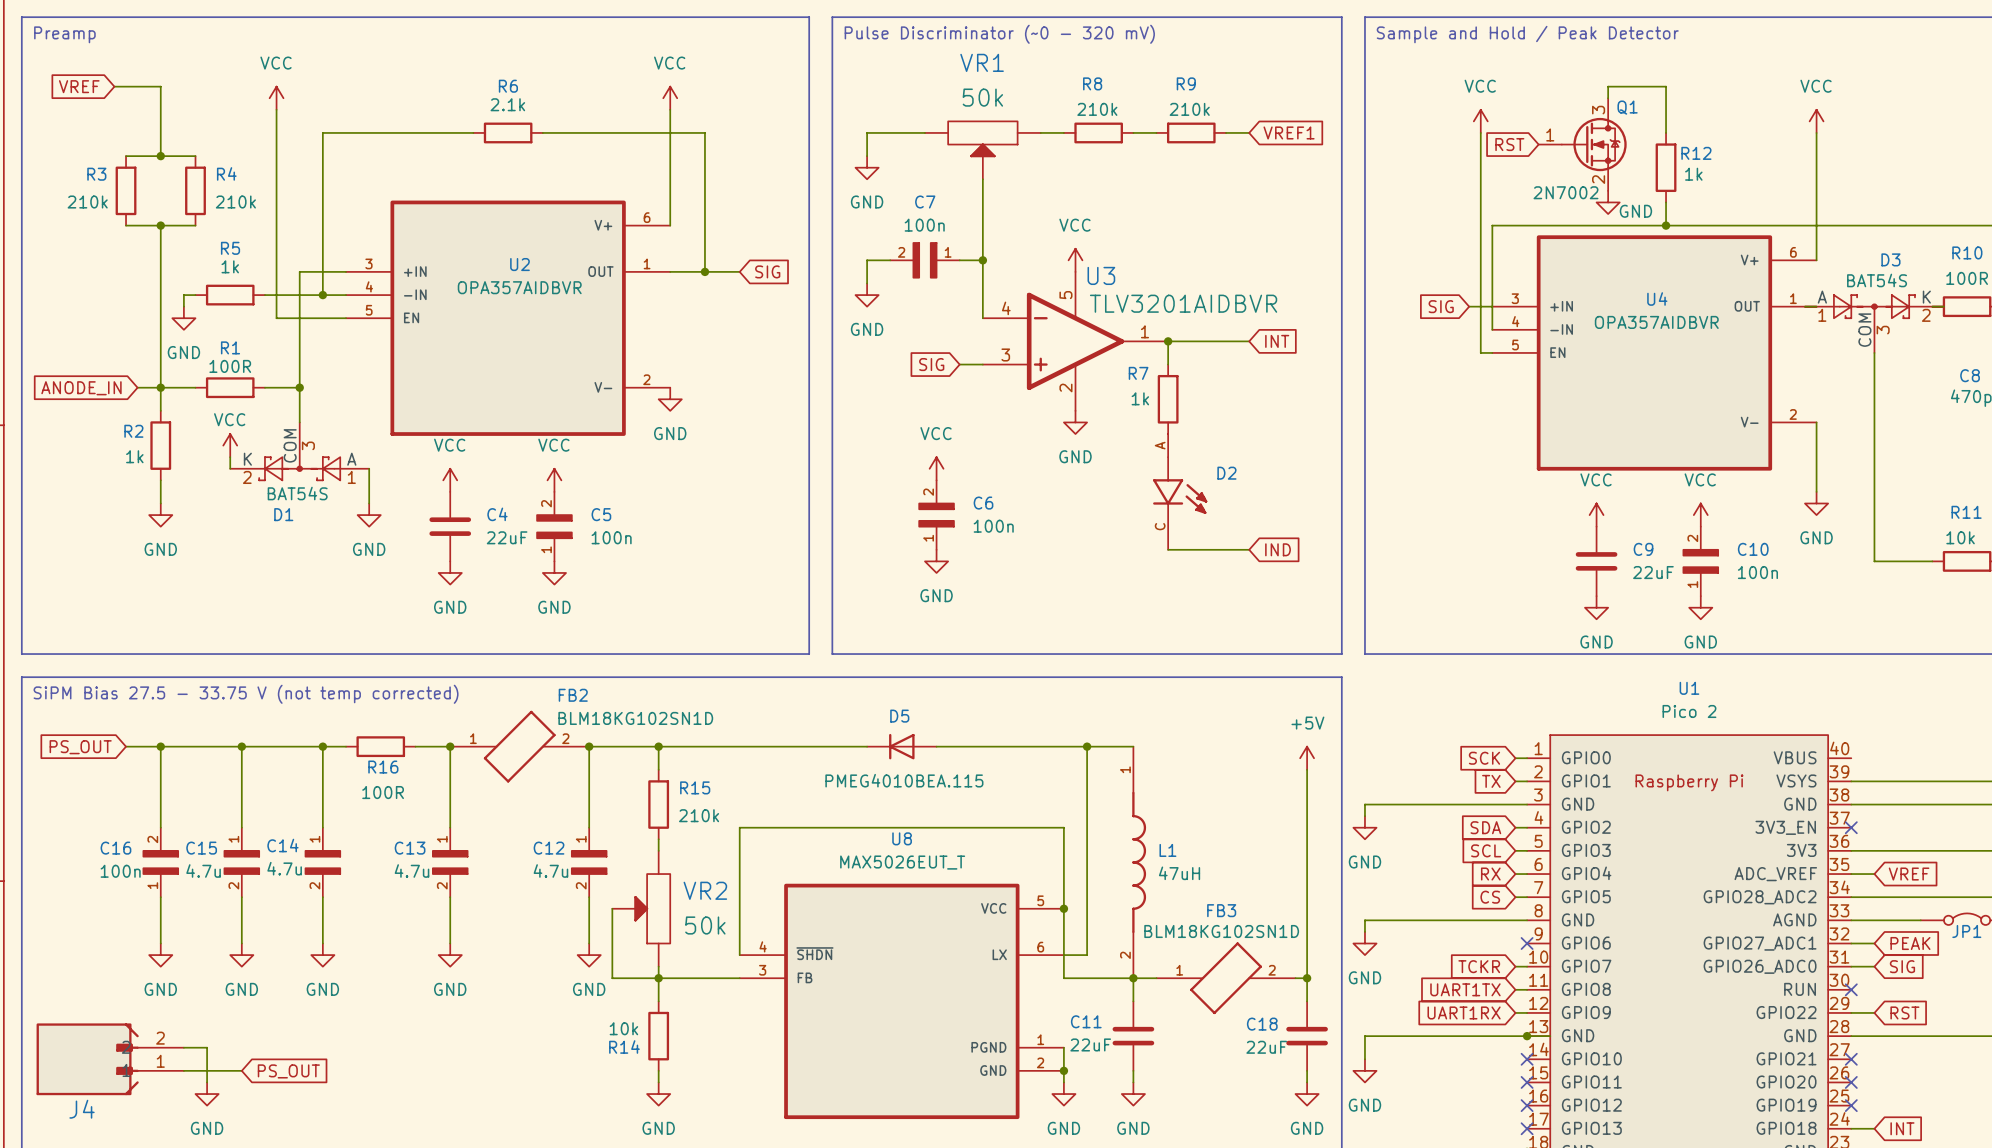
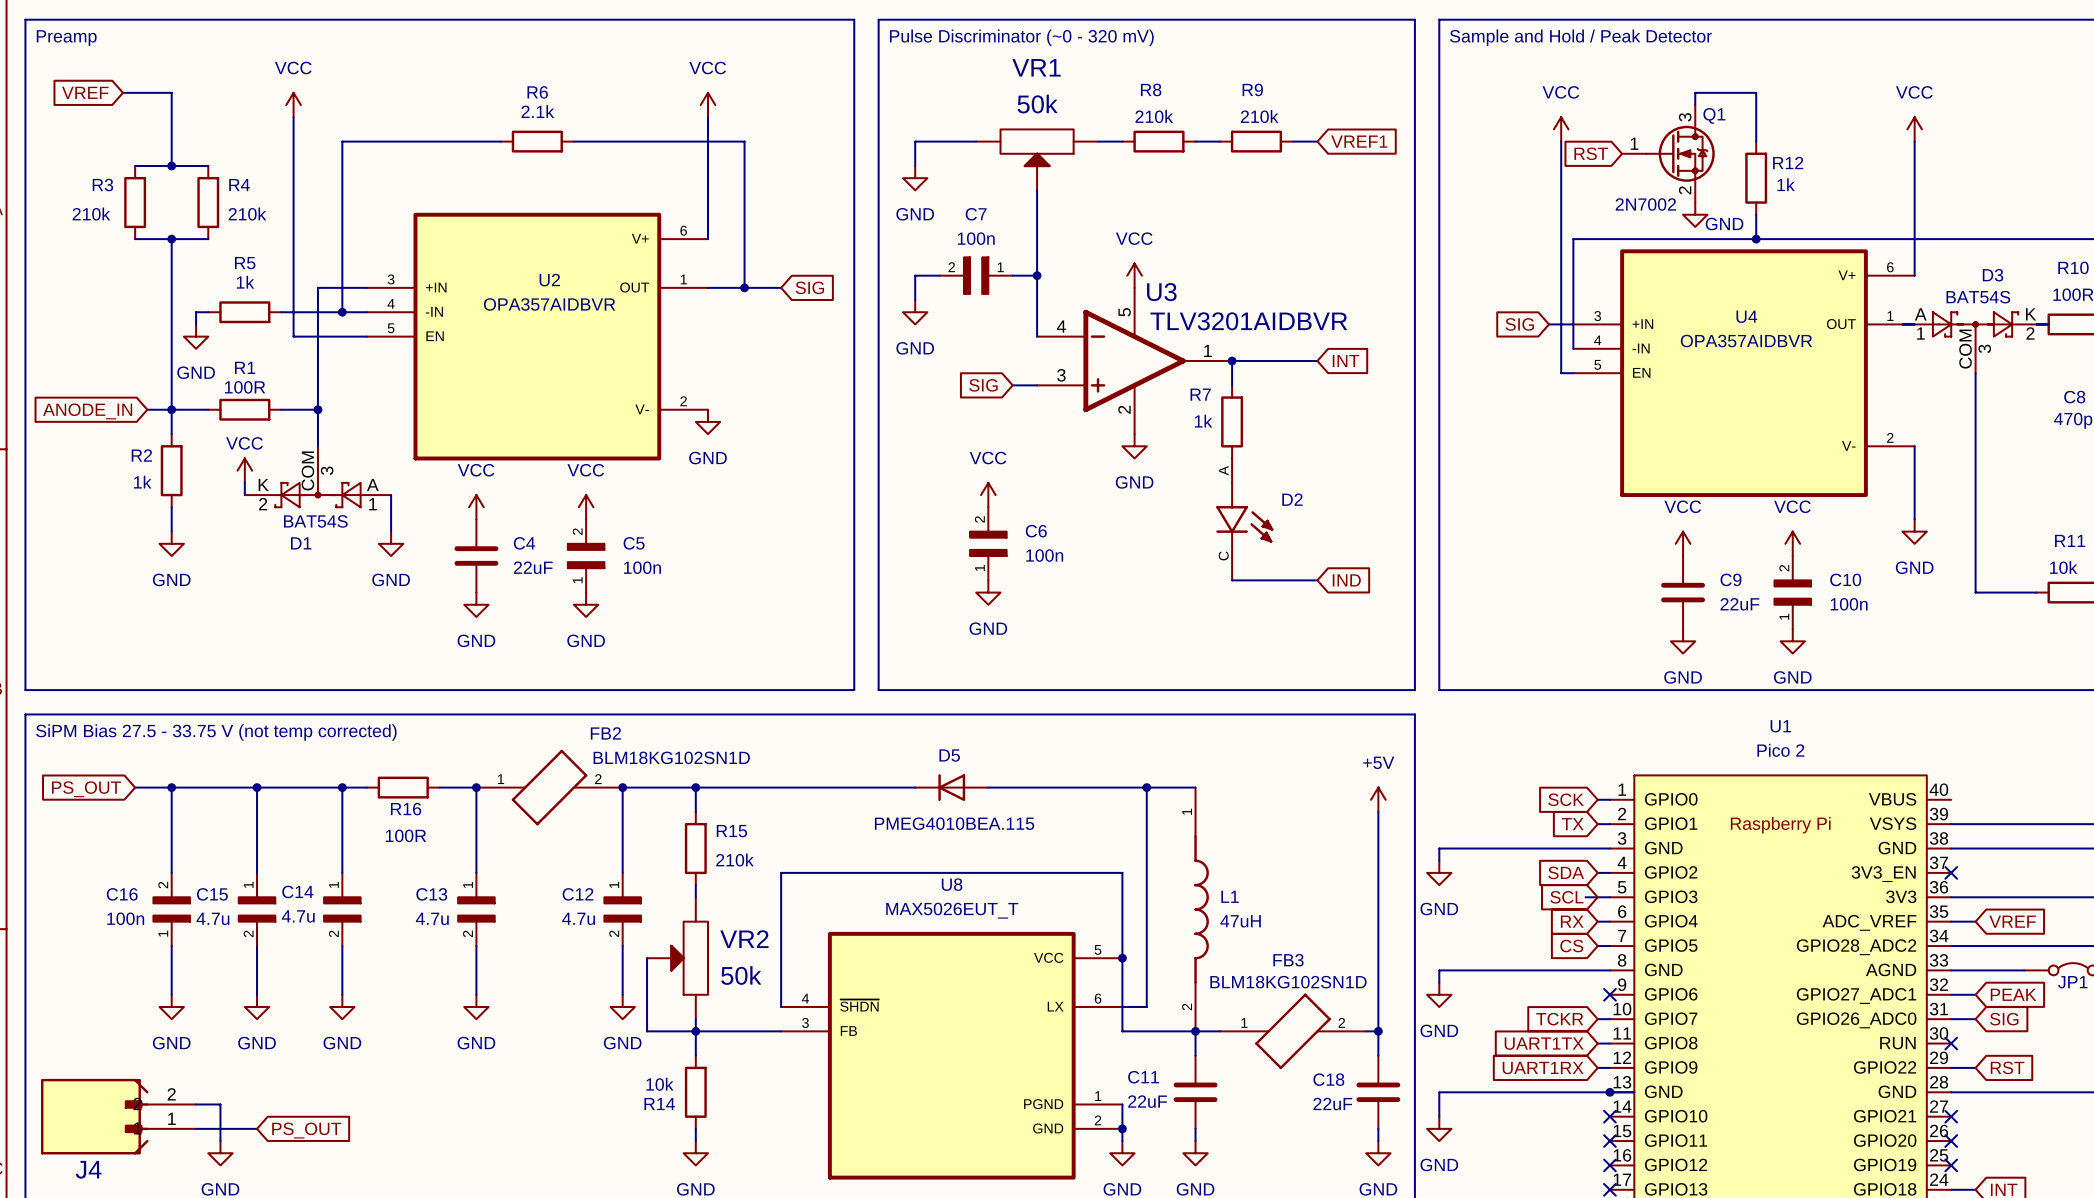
wire: none -> (1585, 897) (1597, 897)

